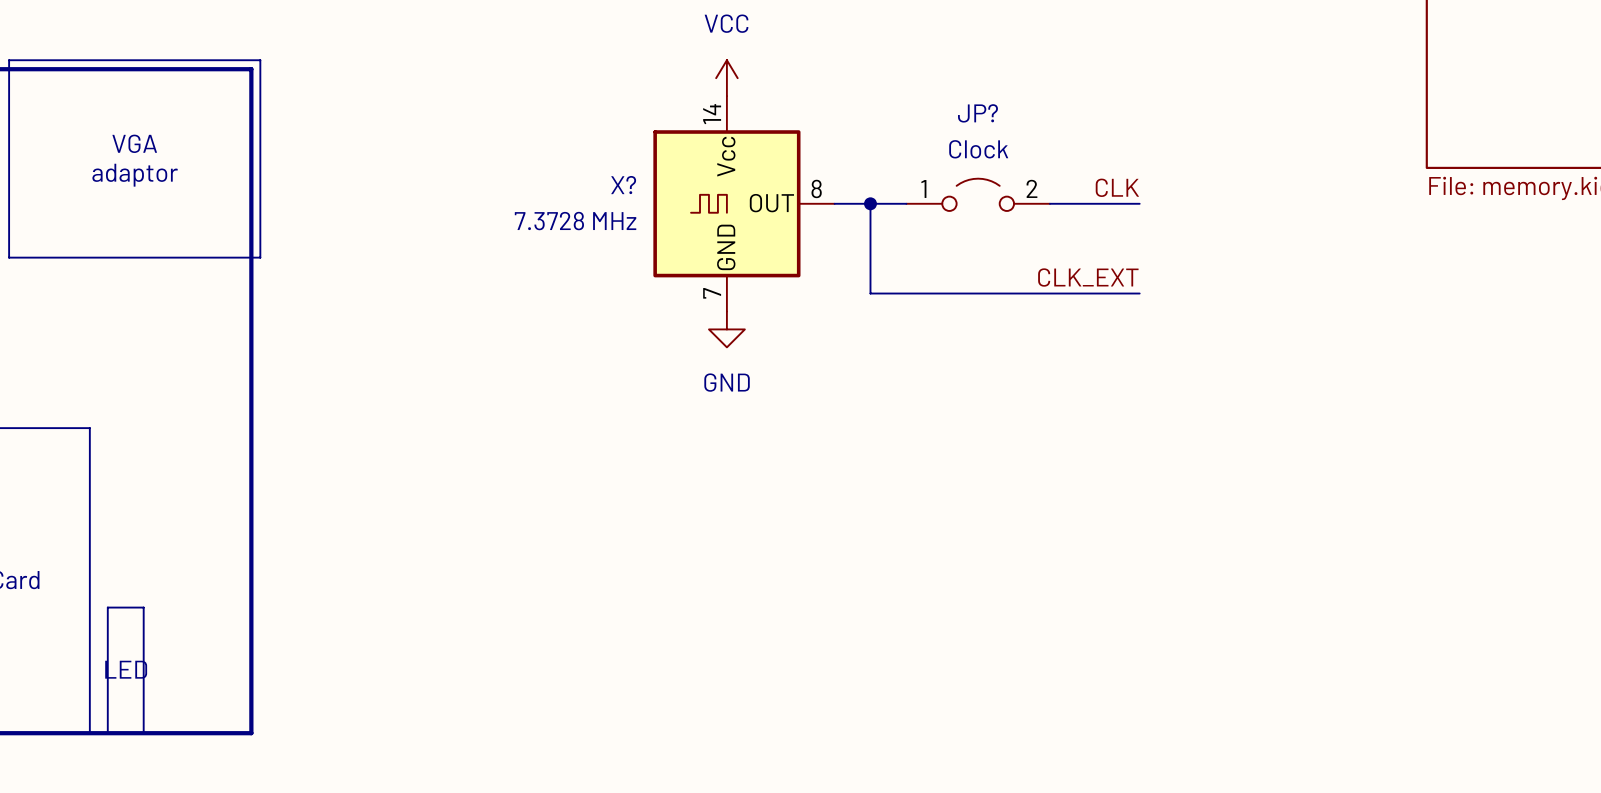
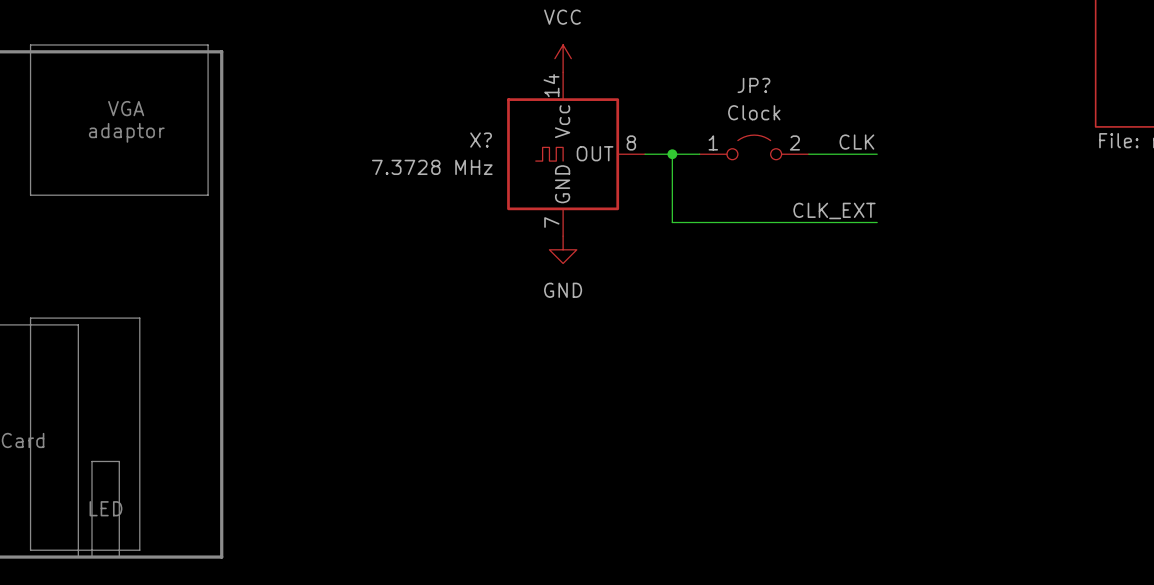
line: (27, 60) (9, 60) (9, 257) (27, 257) -> (30, 44) (30, 195)
line: (251, 69) (251, 733) -> (201, 51) (221, 51) (221, 557) (201, 557)
text position: VGA (134, 143) -> VGA (126, 108)
text position: adaptor (135, 175) -> adaptor (126, 132)
line: none -> (30, 318) (139, 318) (139, 550) (30, 550) (30, 318)

